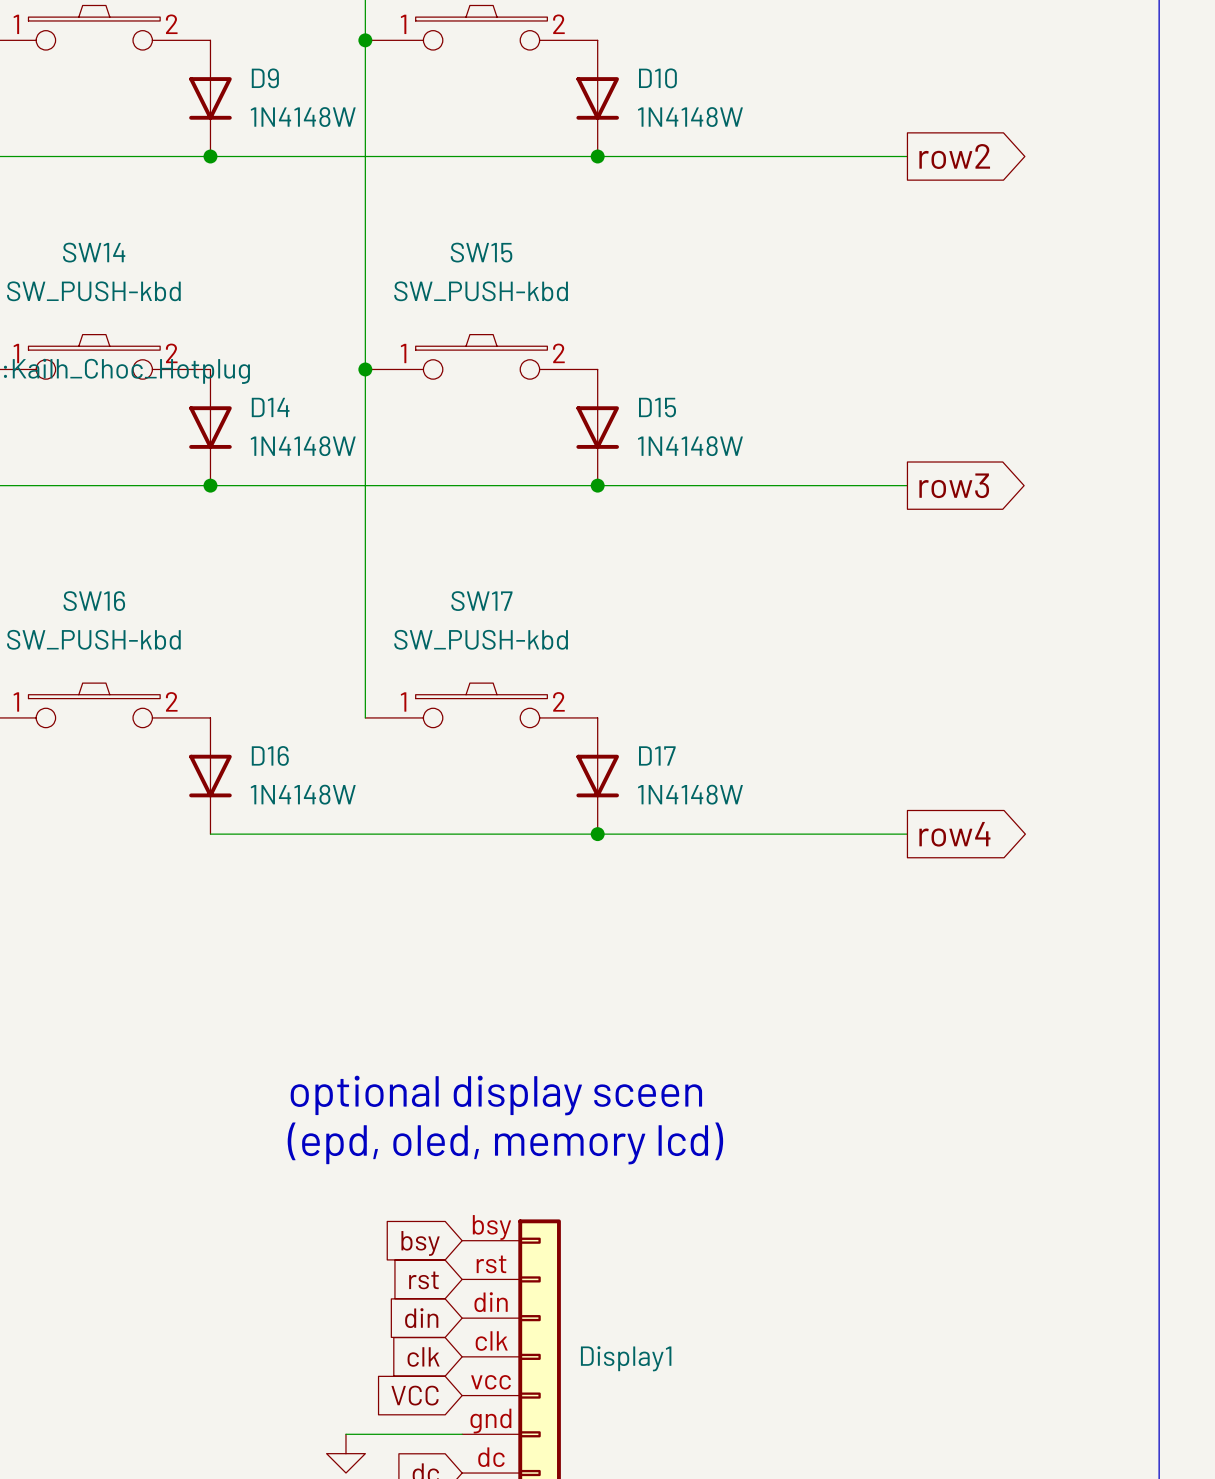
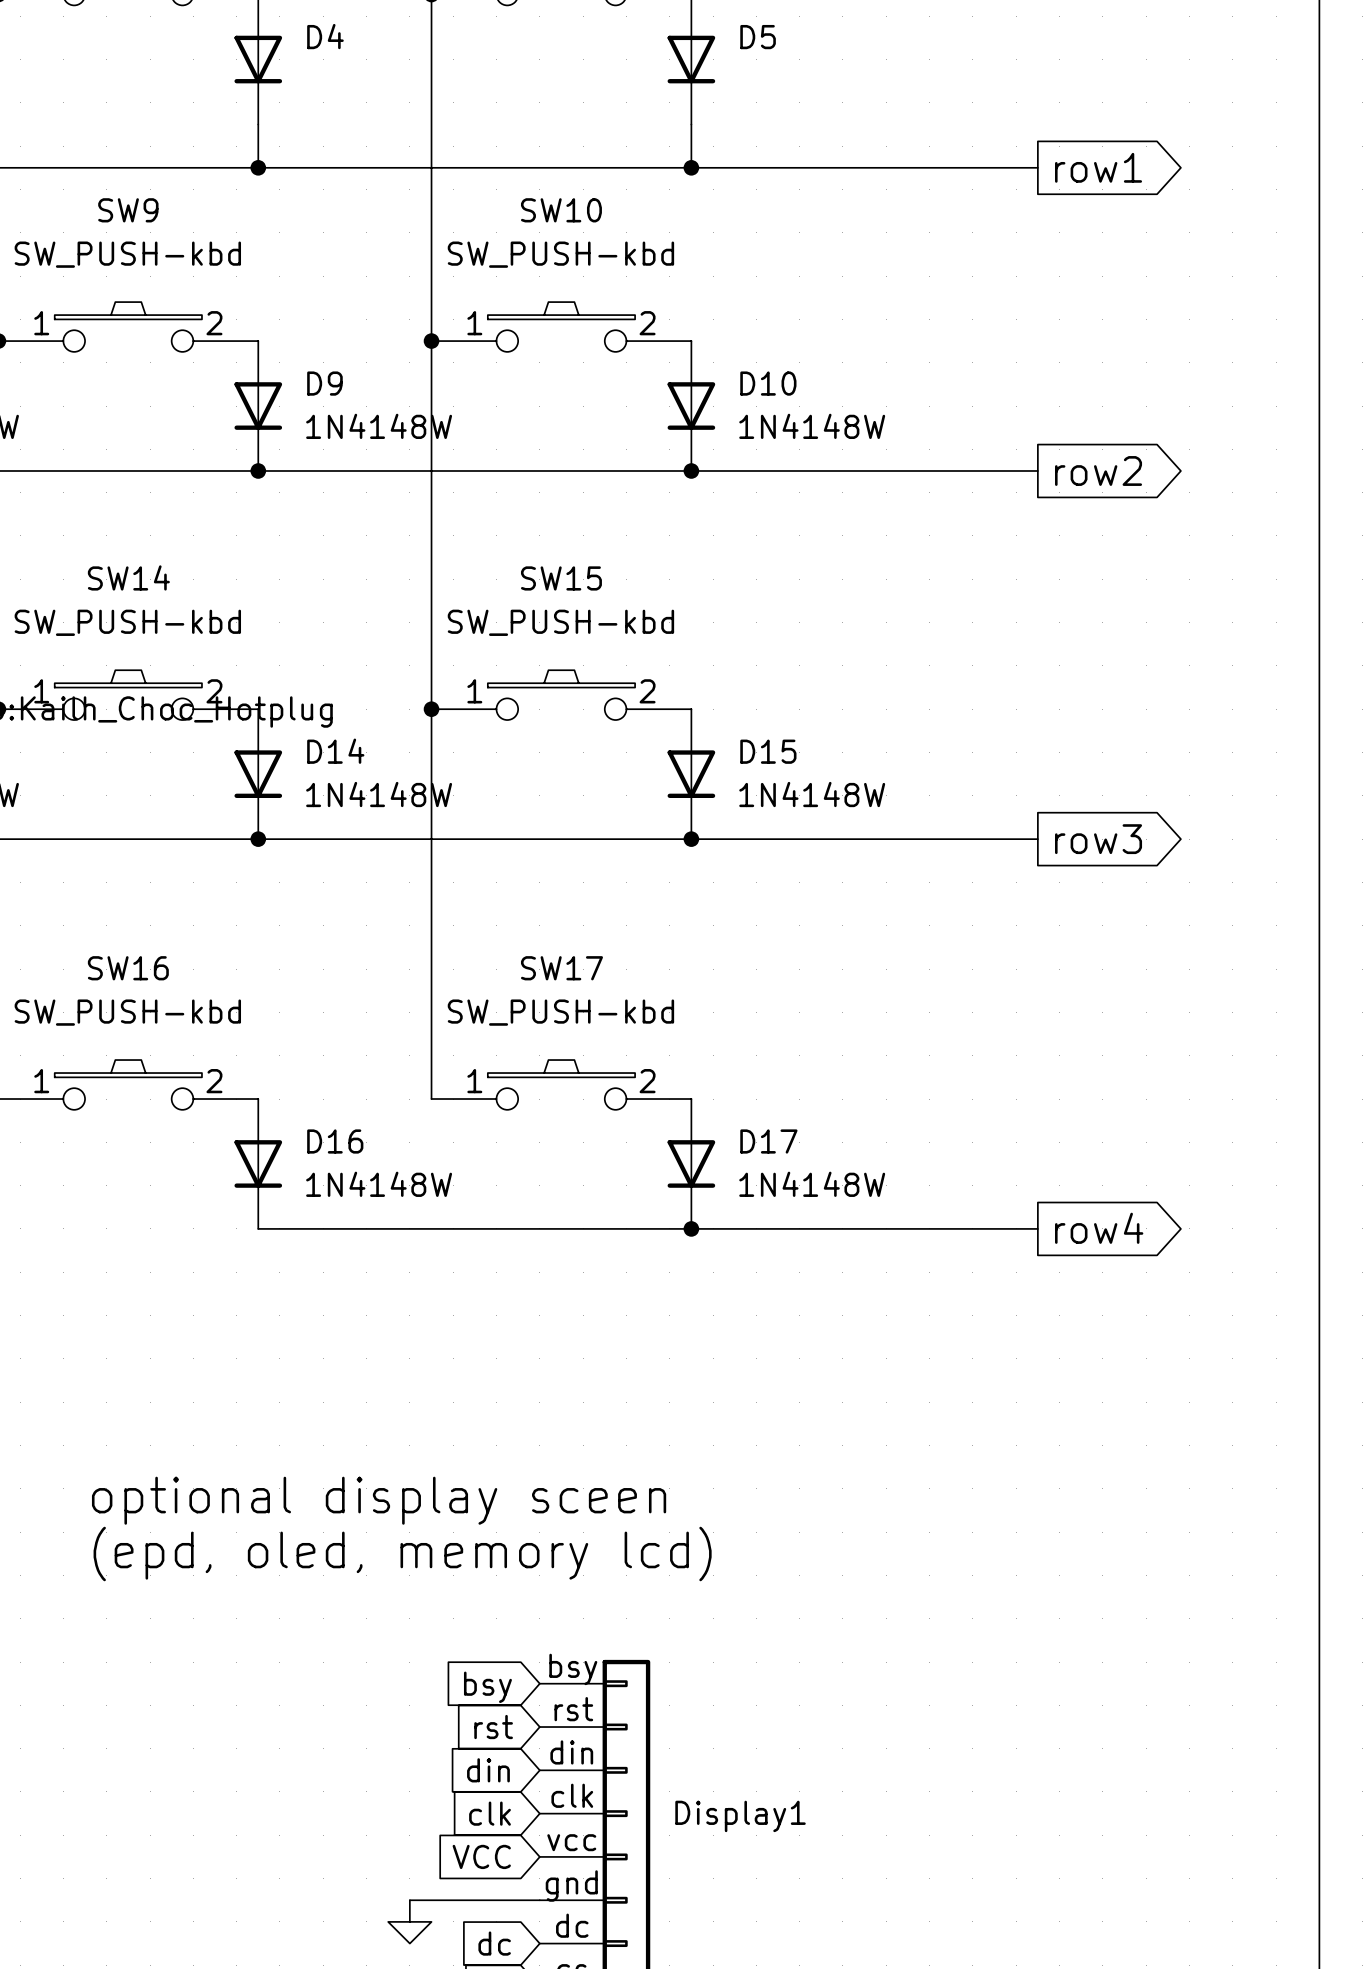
text position: optional display sceen (496, 1095) -> optional display sceen (379, 1500)
text position: (epd, oled, memory lcd) (505, 1143) -> (epd, oled, memory lcd) (402, 1553)

